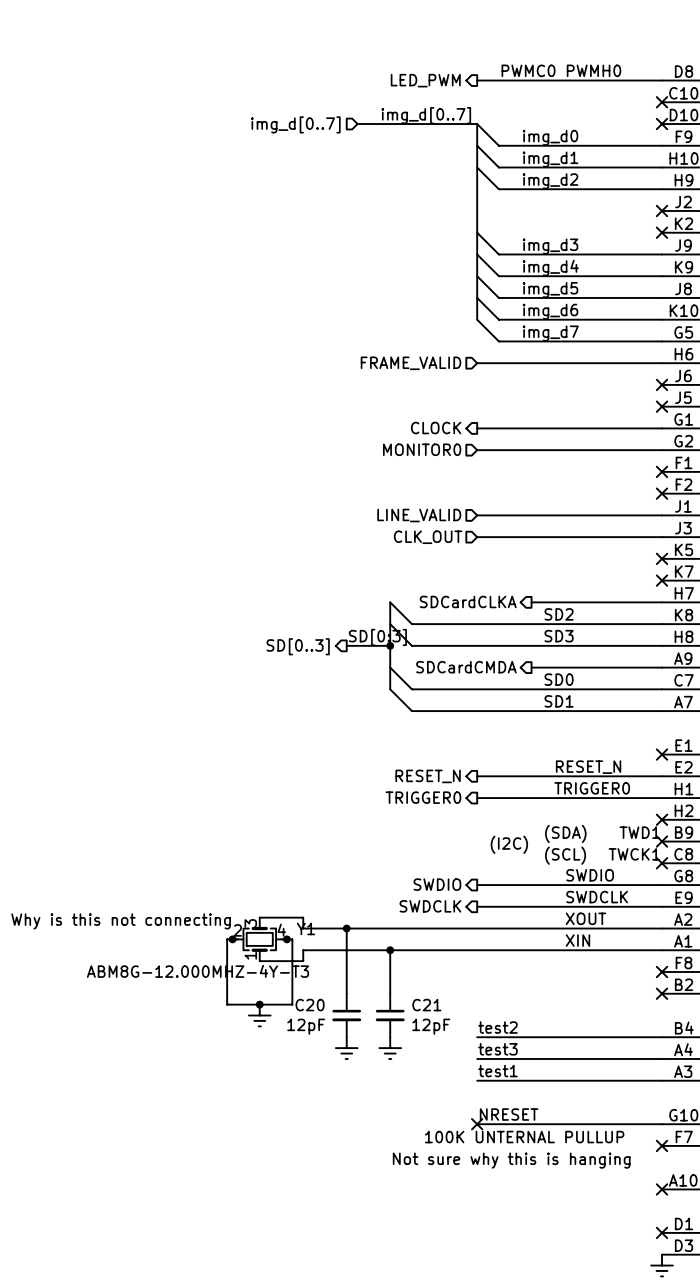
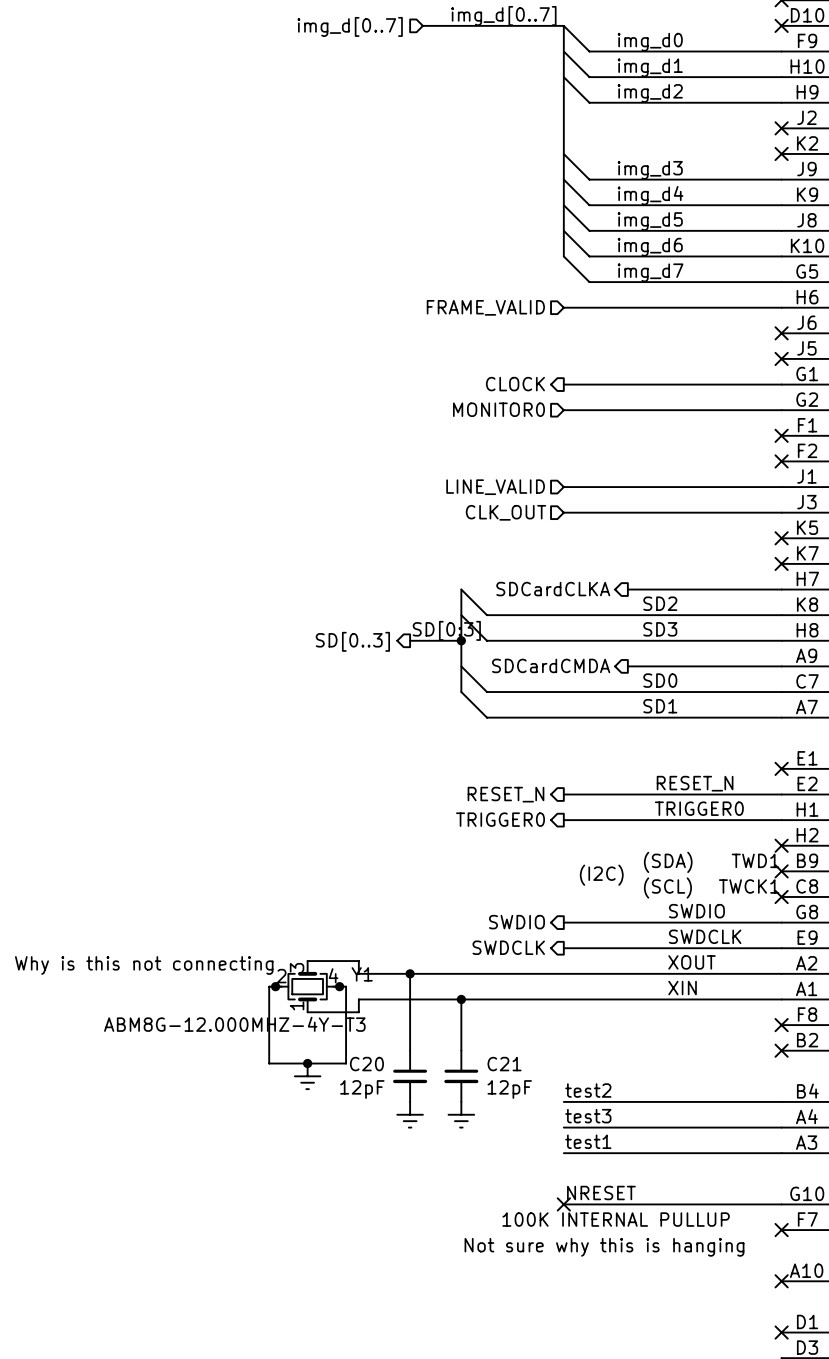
text: 100K UNTERNAL PULLUP (524, 1137) -> 100K INTERNAL PULLUP (616, 1219)

